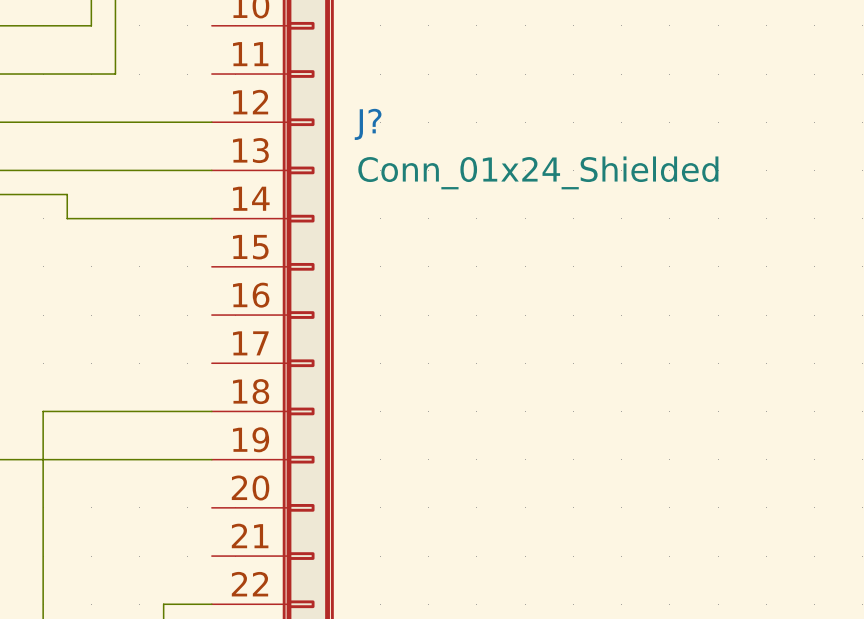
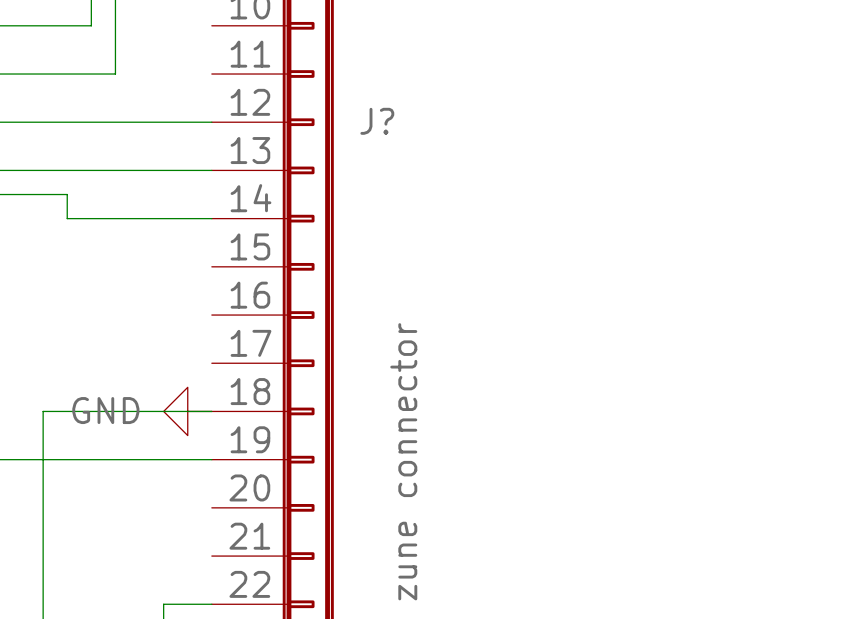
J? value: Conn_01x24_Shielded (538, 172) -> zune connector (403, 461)
power symbol: none -> GND (187, 411)

